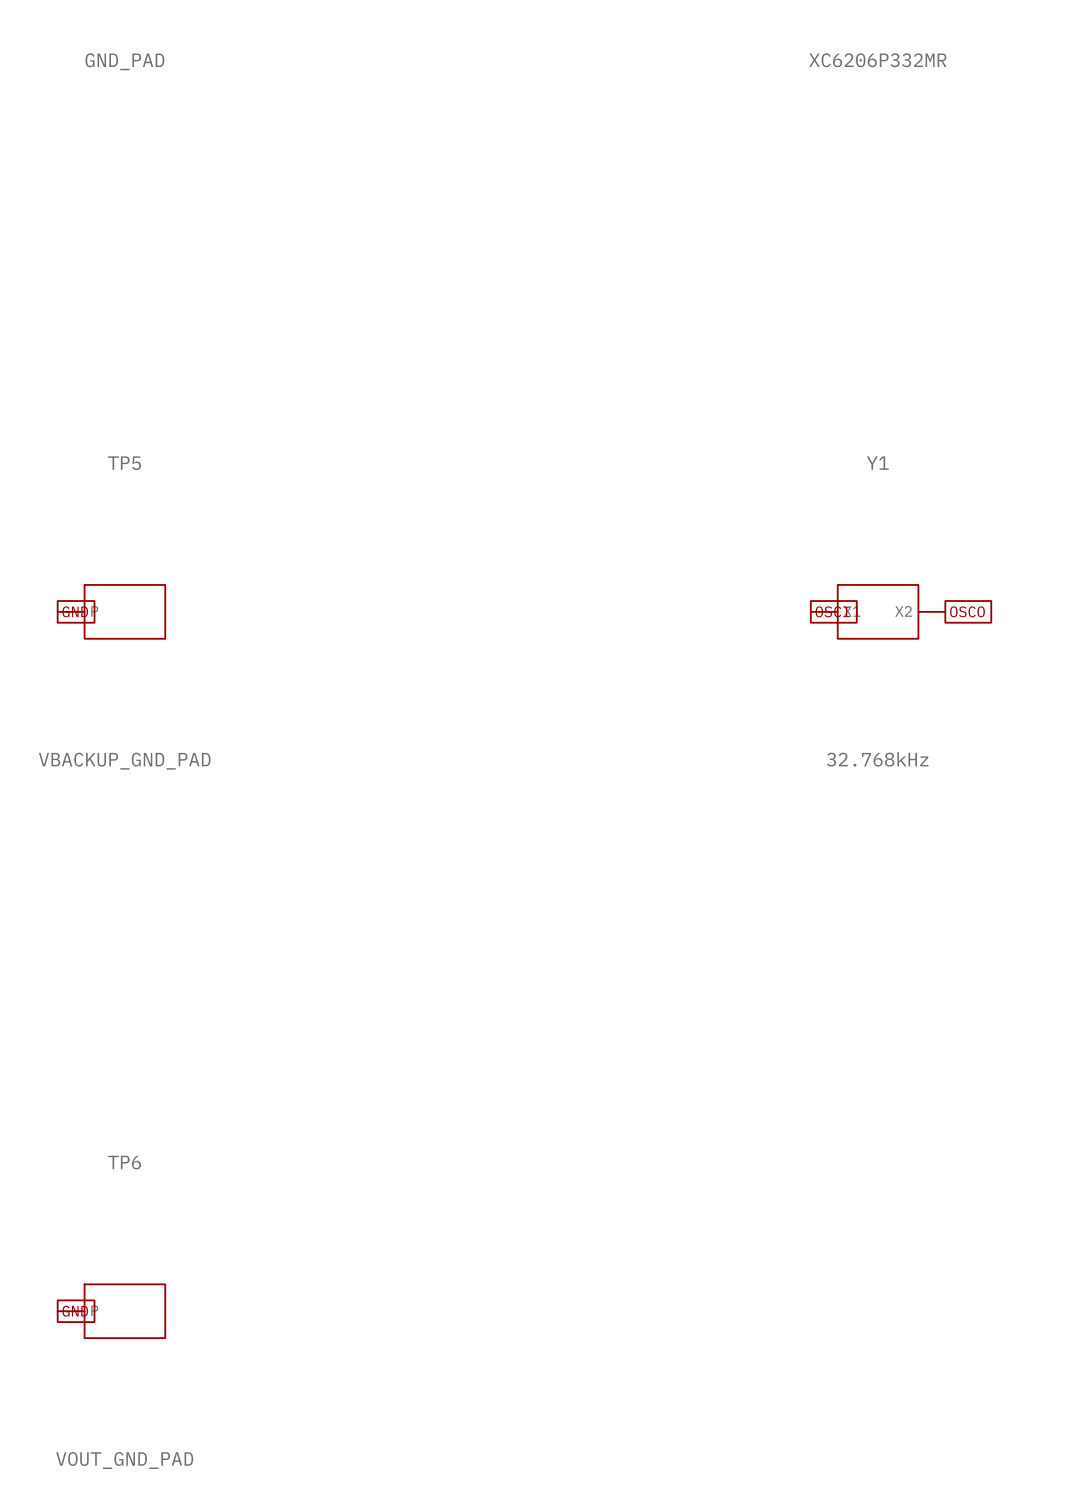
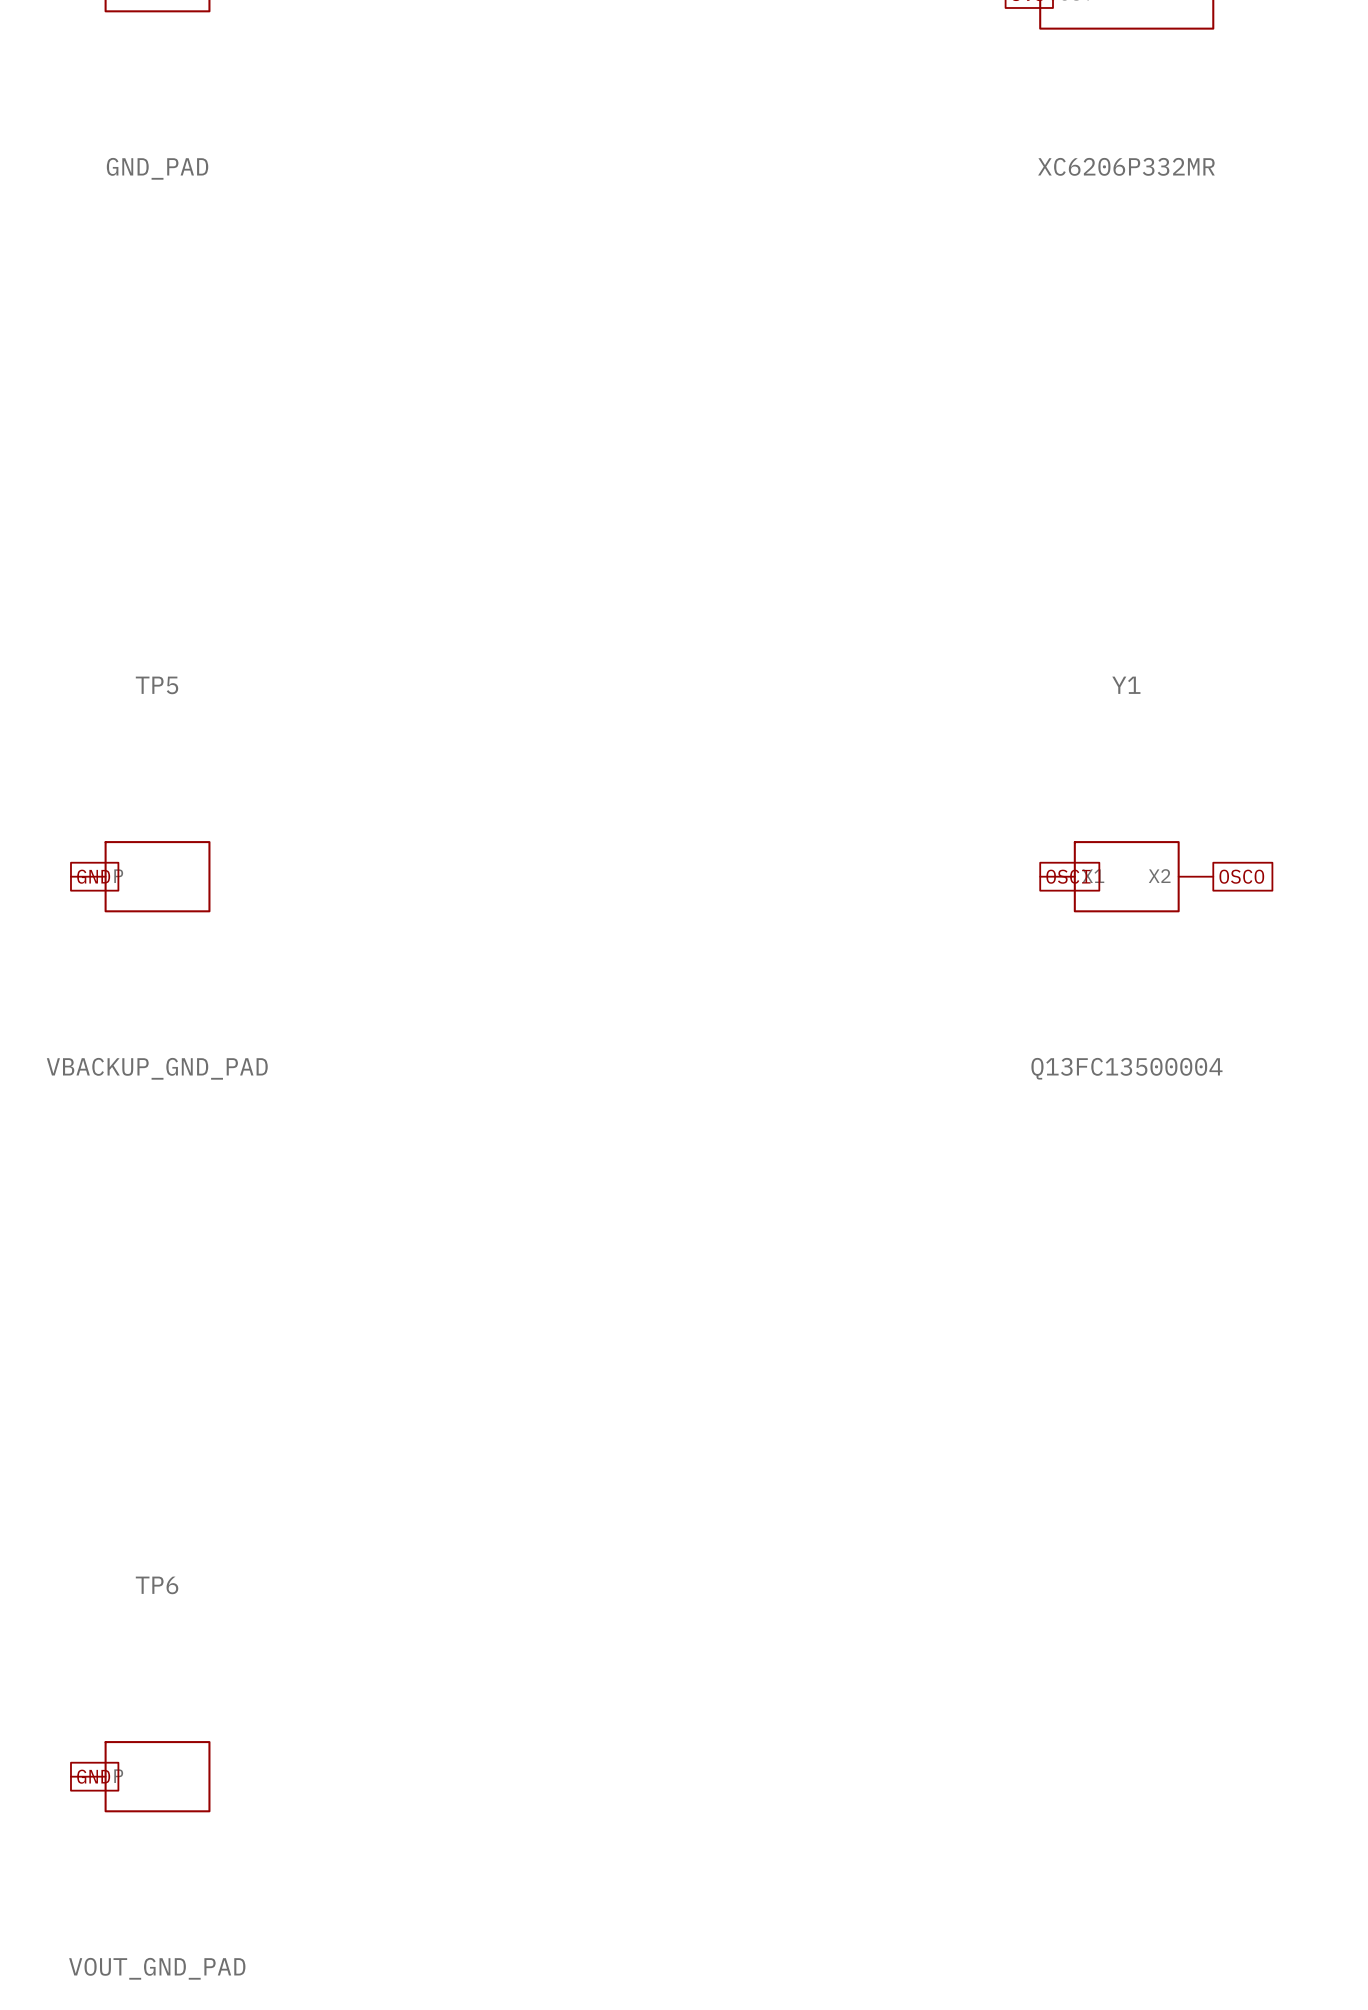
Y1 value: 32.768kHz (877, 759) -> Q13FC13500004 (1126, 1068)

